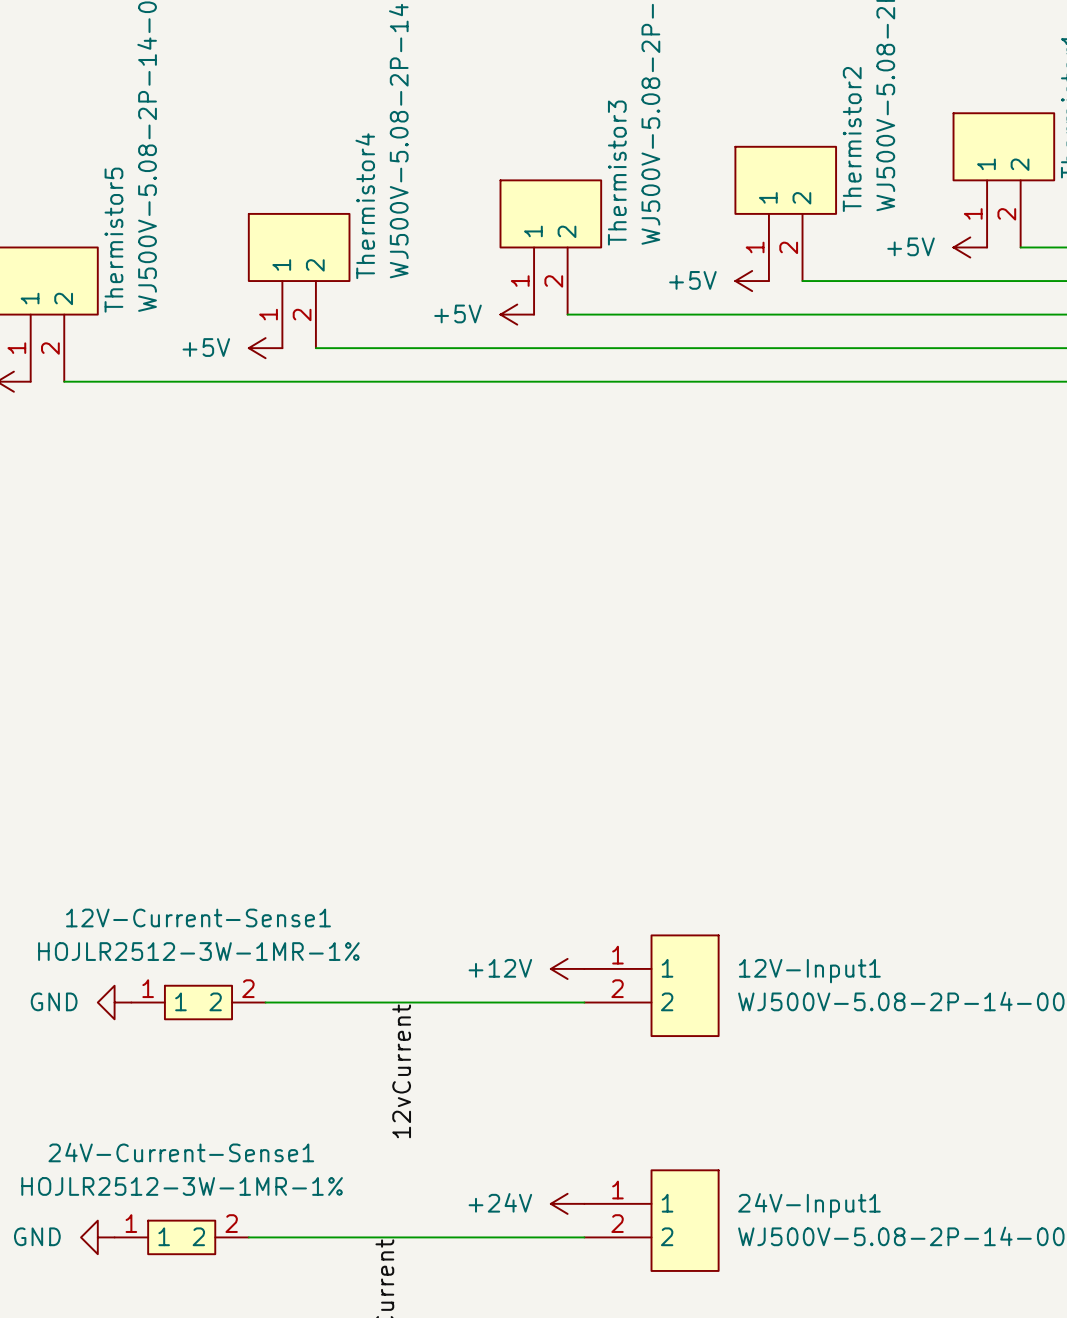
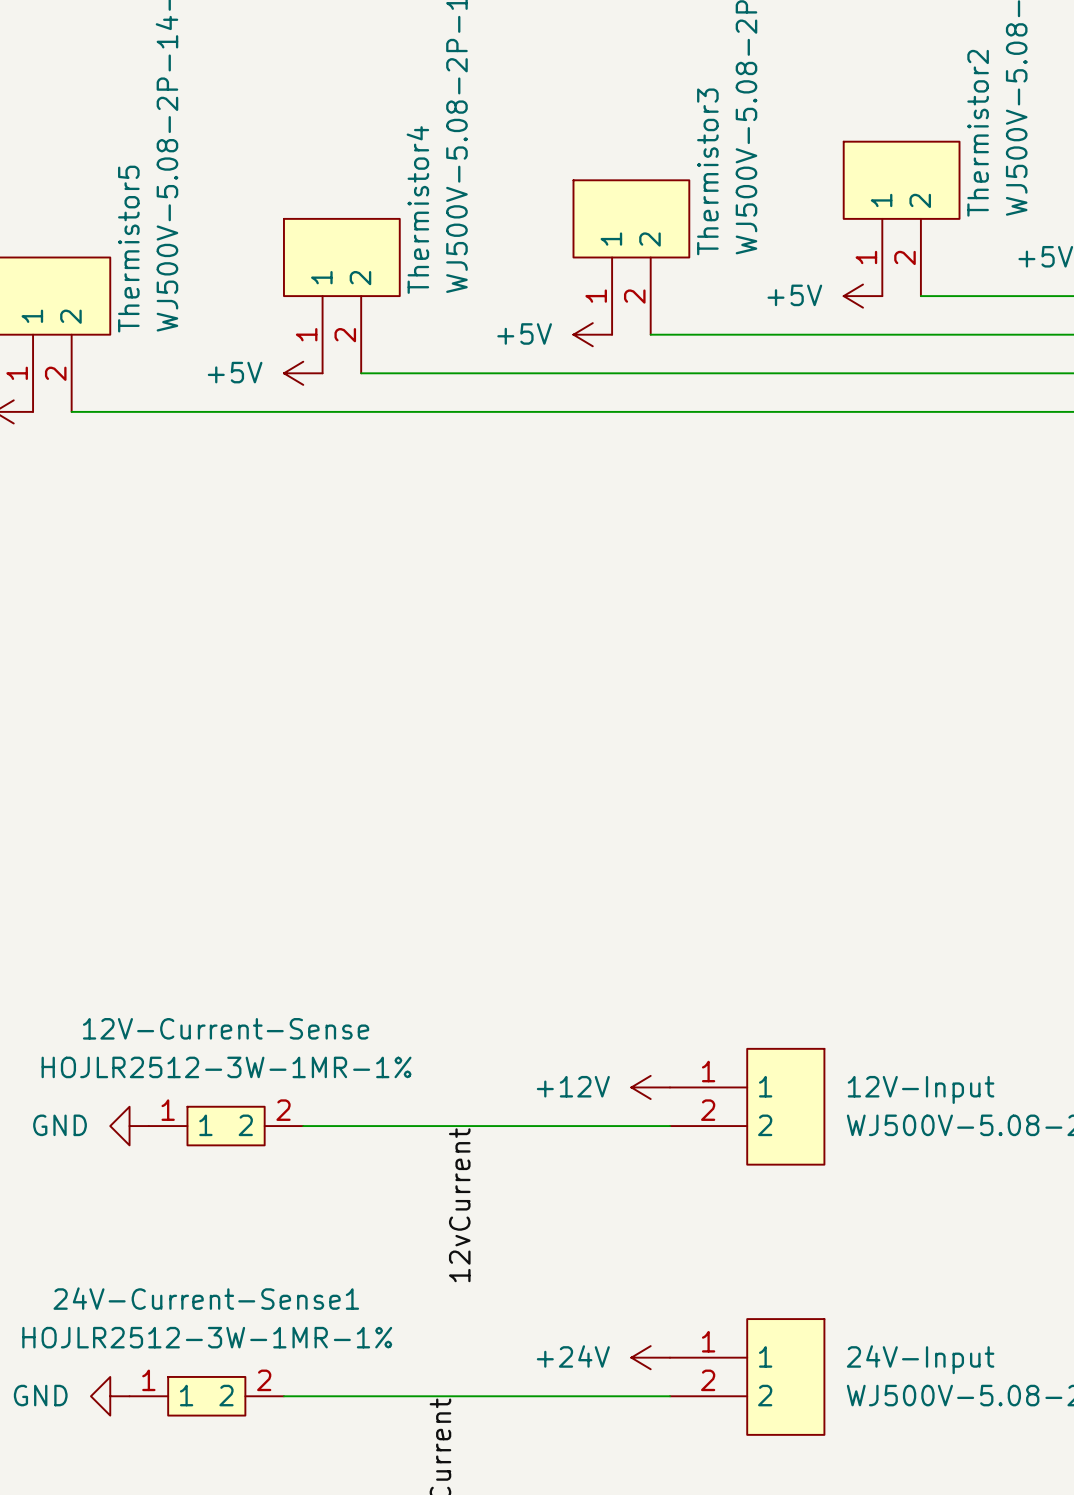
12V-Current-Sense1 name: 12V-Current-Sense1 (198, 917) -> 12V-Current-Sense (226, 1028)
12V-Input1 name: 12V-Input1 (809, 971) -> 12V-Input (921, 1089)
24V-Input1 name: 24V-Input1 (809, 1205) -> 24V-Input (920, 1359)

